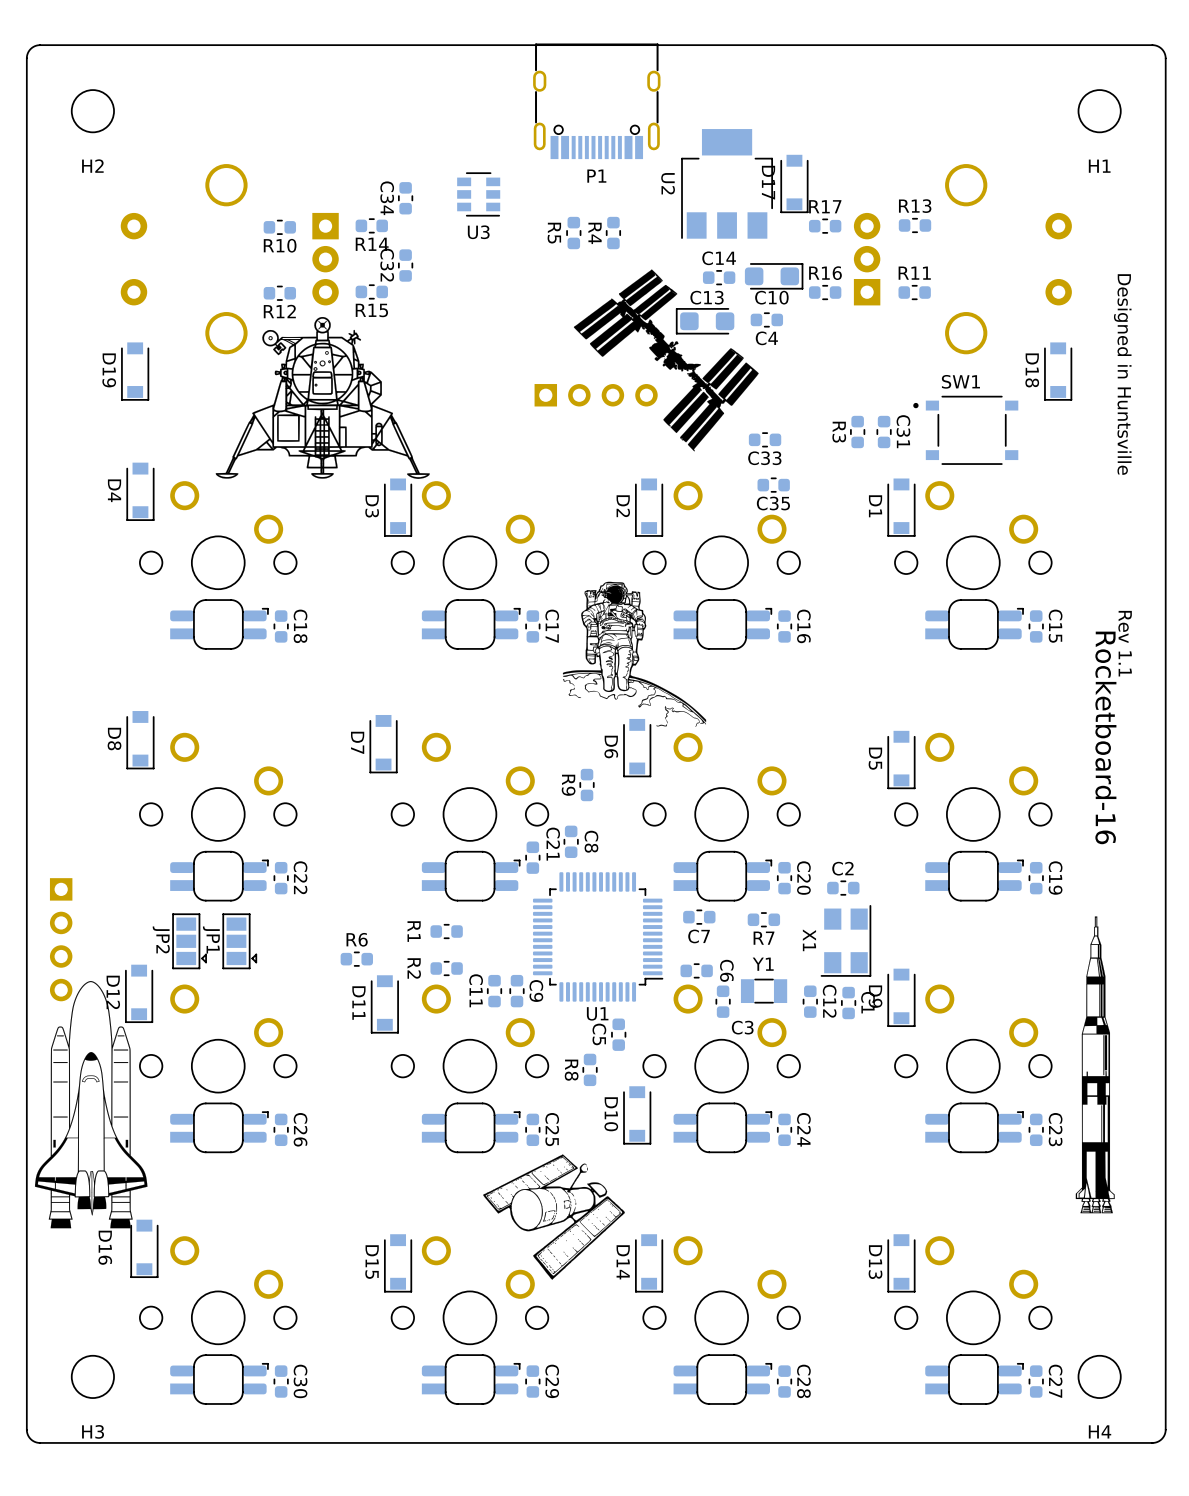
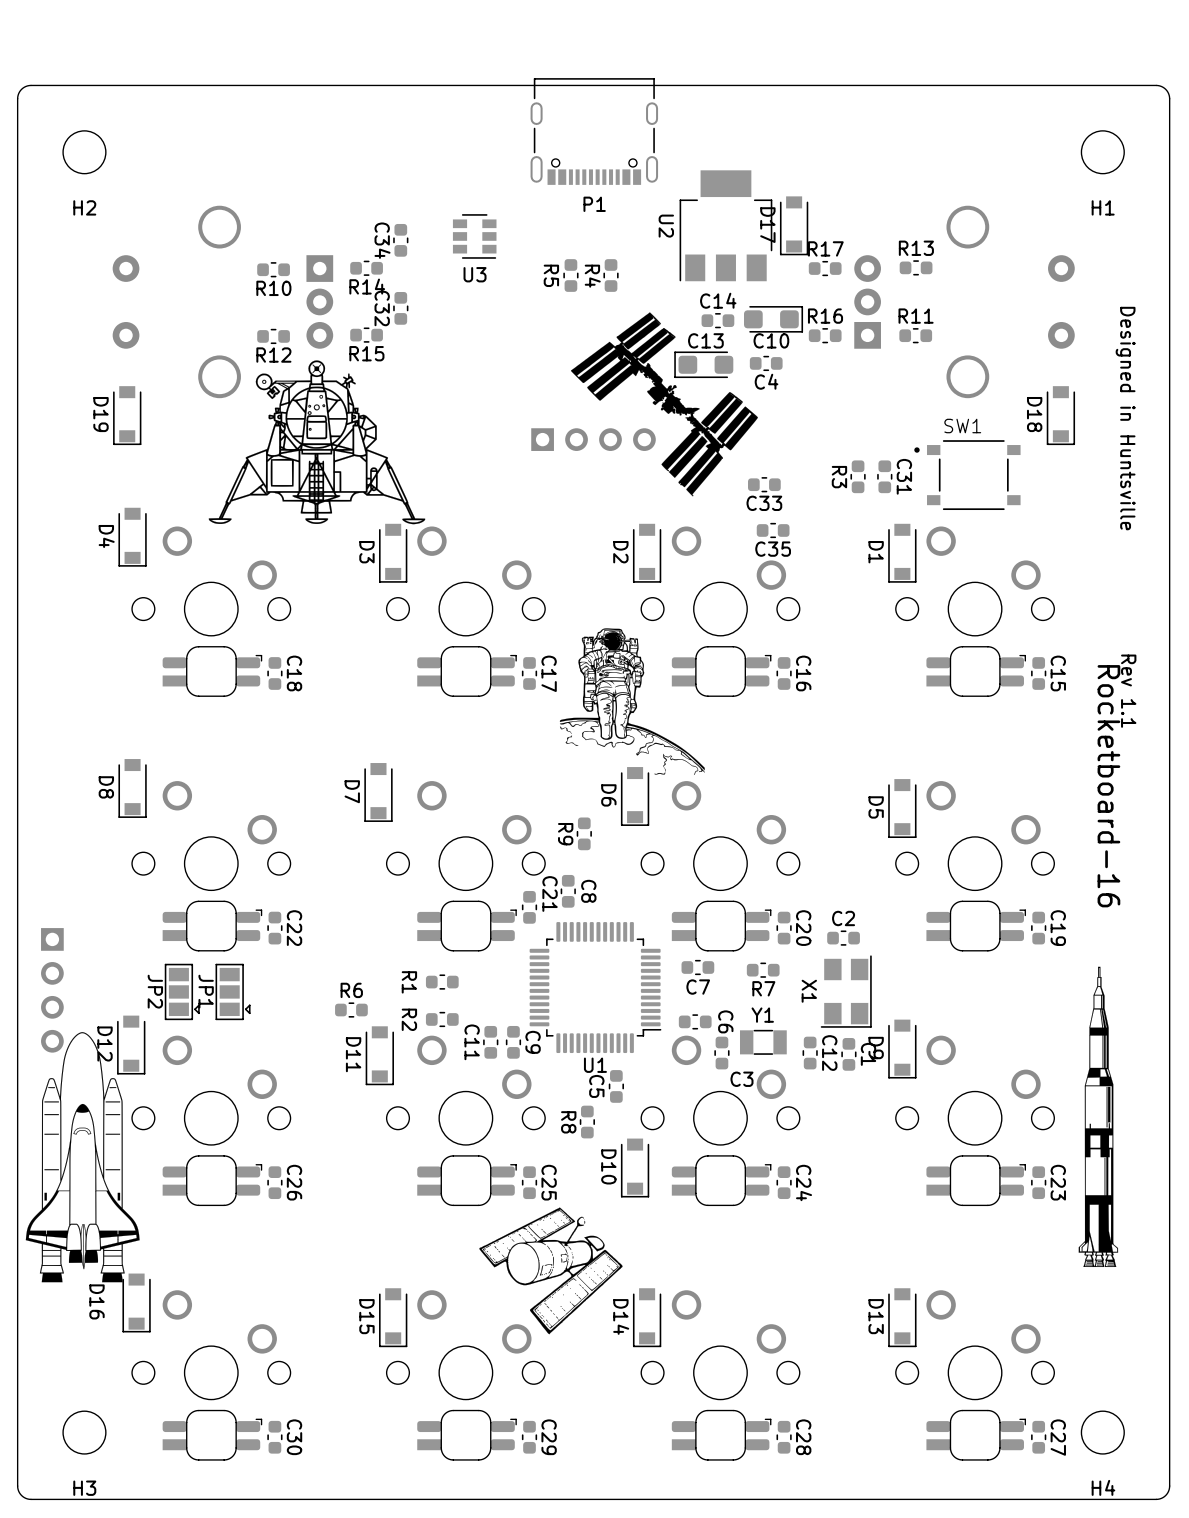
P1 footprint: [533, 43, 661, 160] -> [530, 78, 659, 185]

